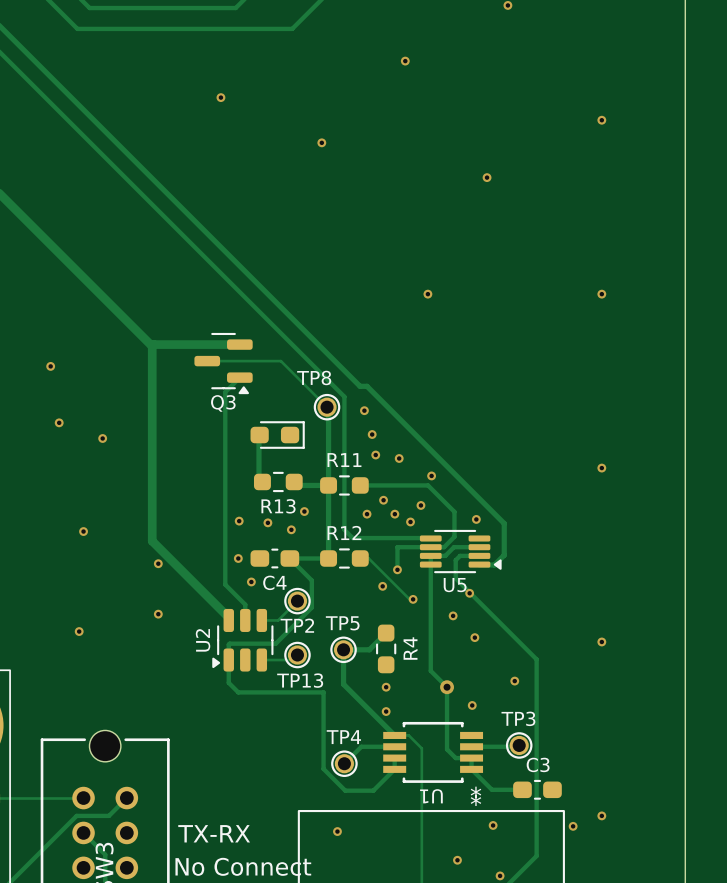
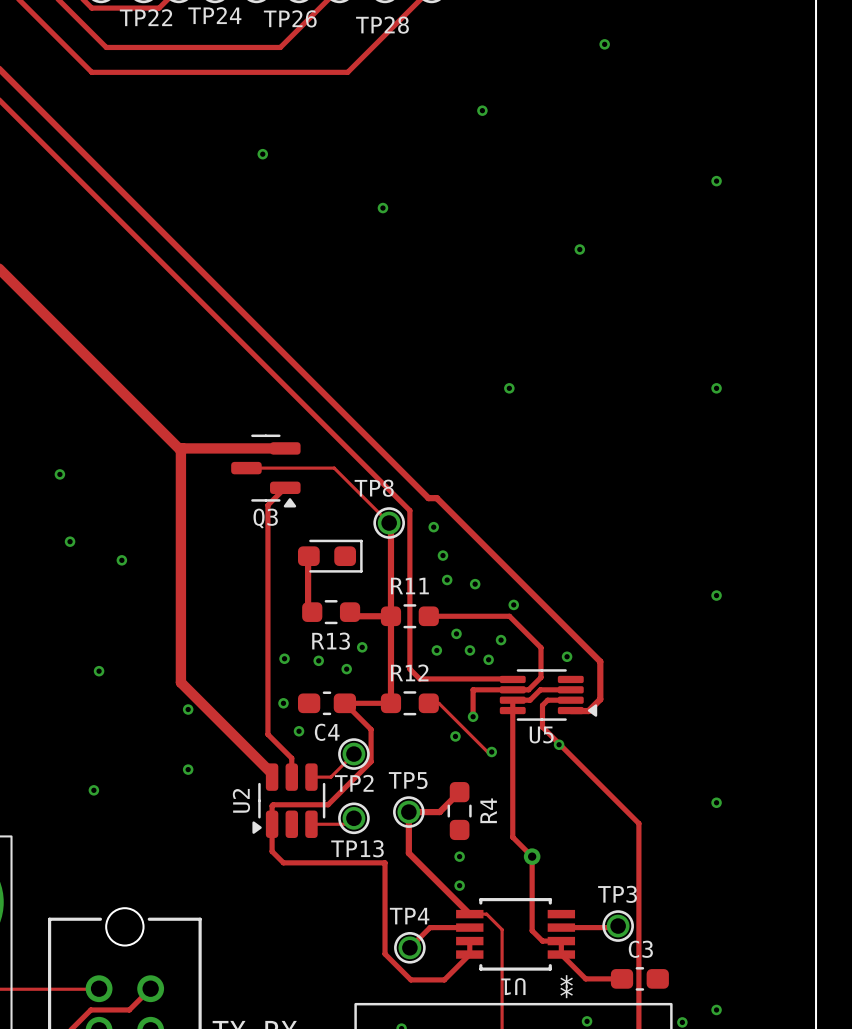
via: (453, 615) -> none
via: (474, 637) -> none
via: (514, 681) -> none
via: (472, 705) -> none

